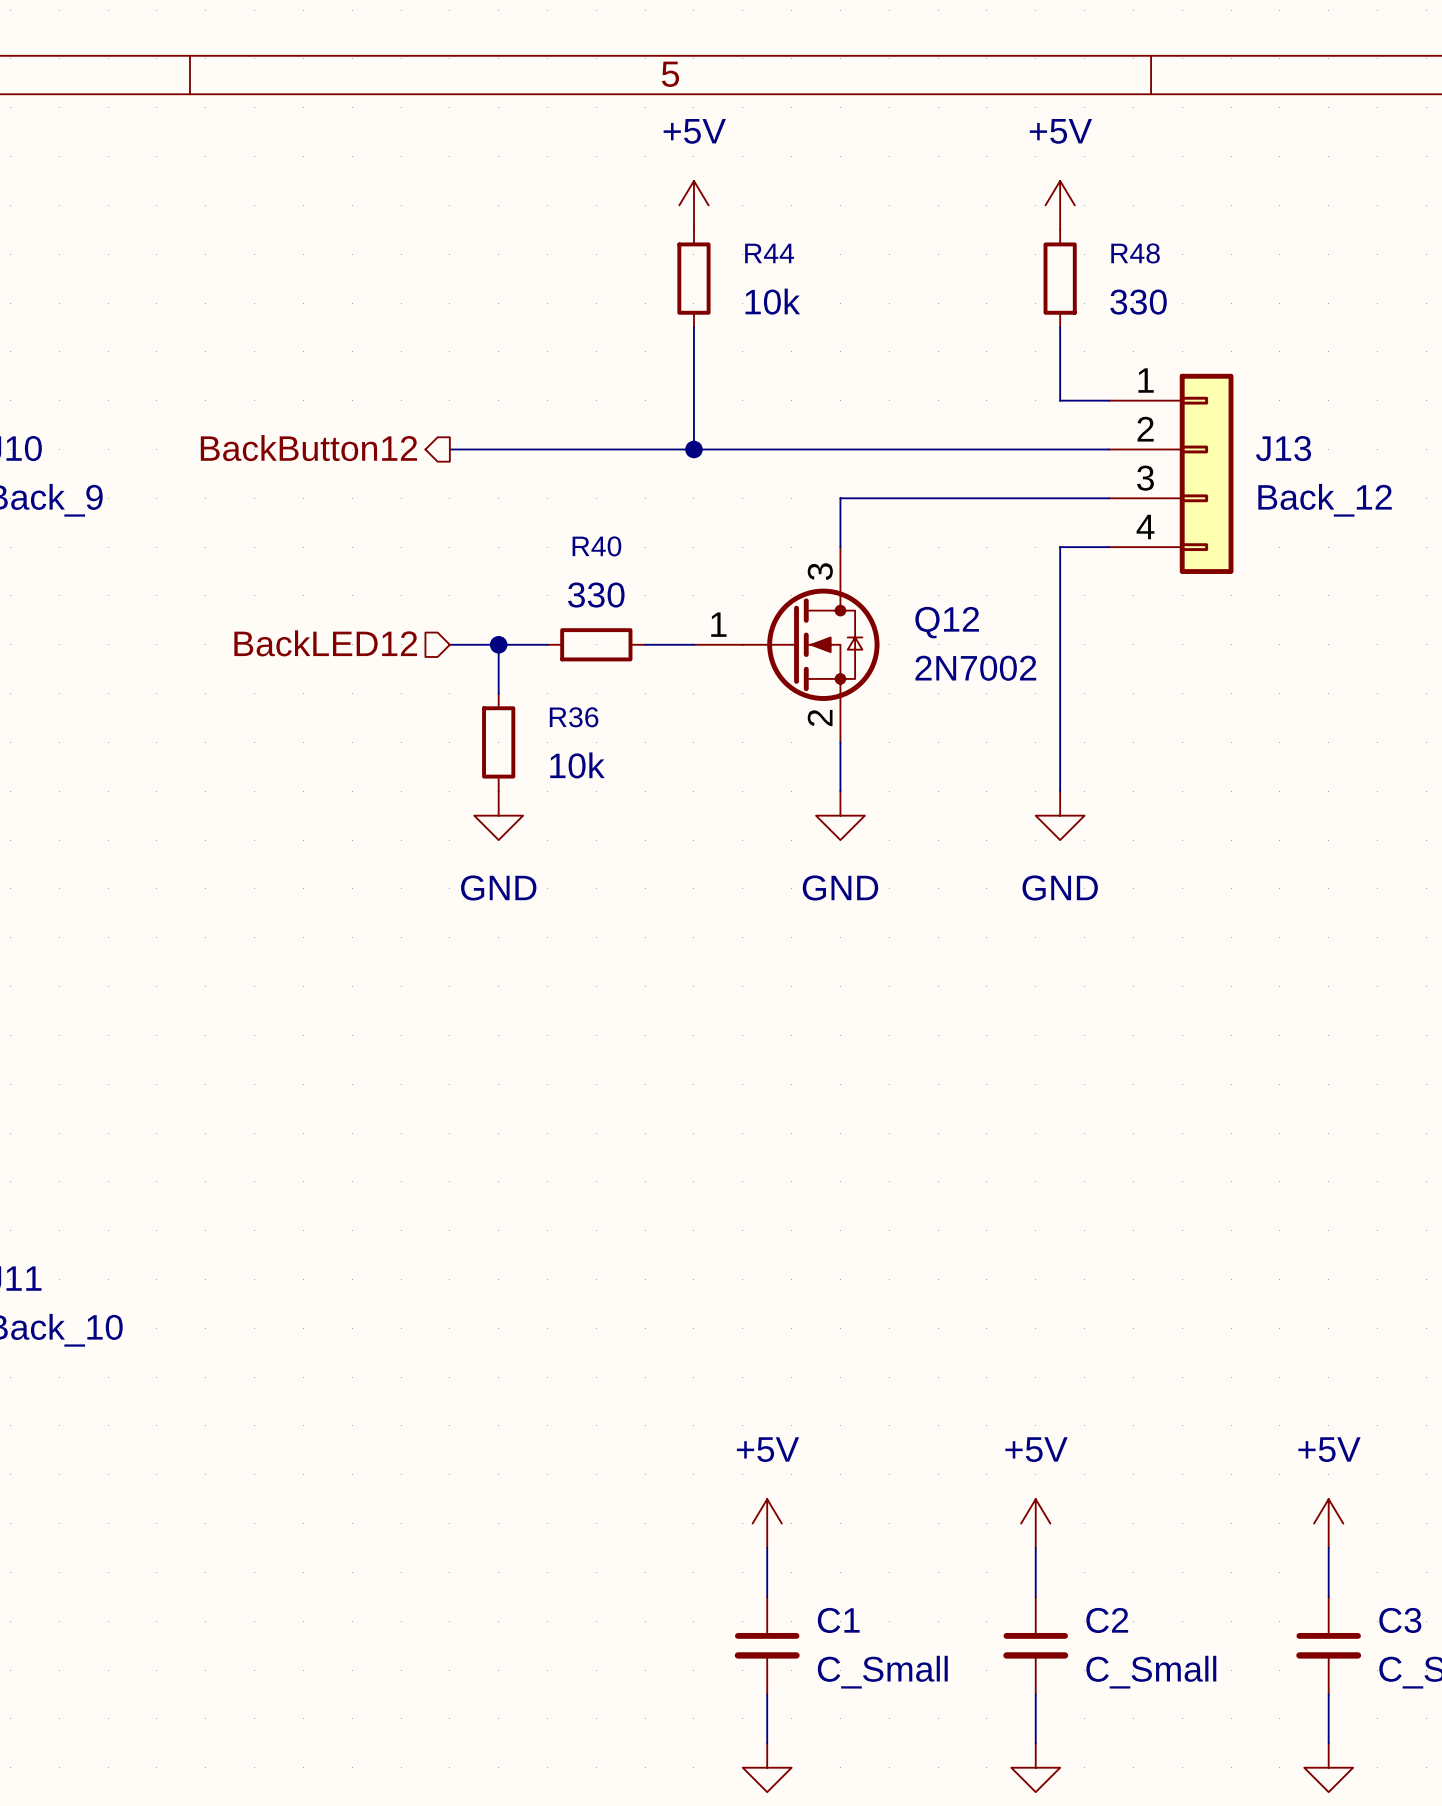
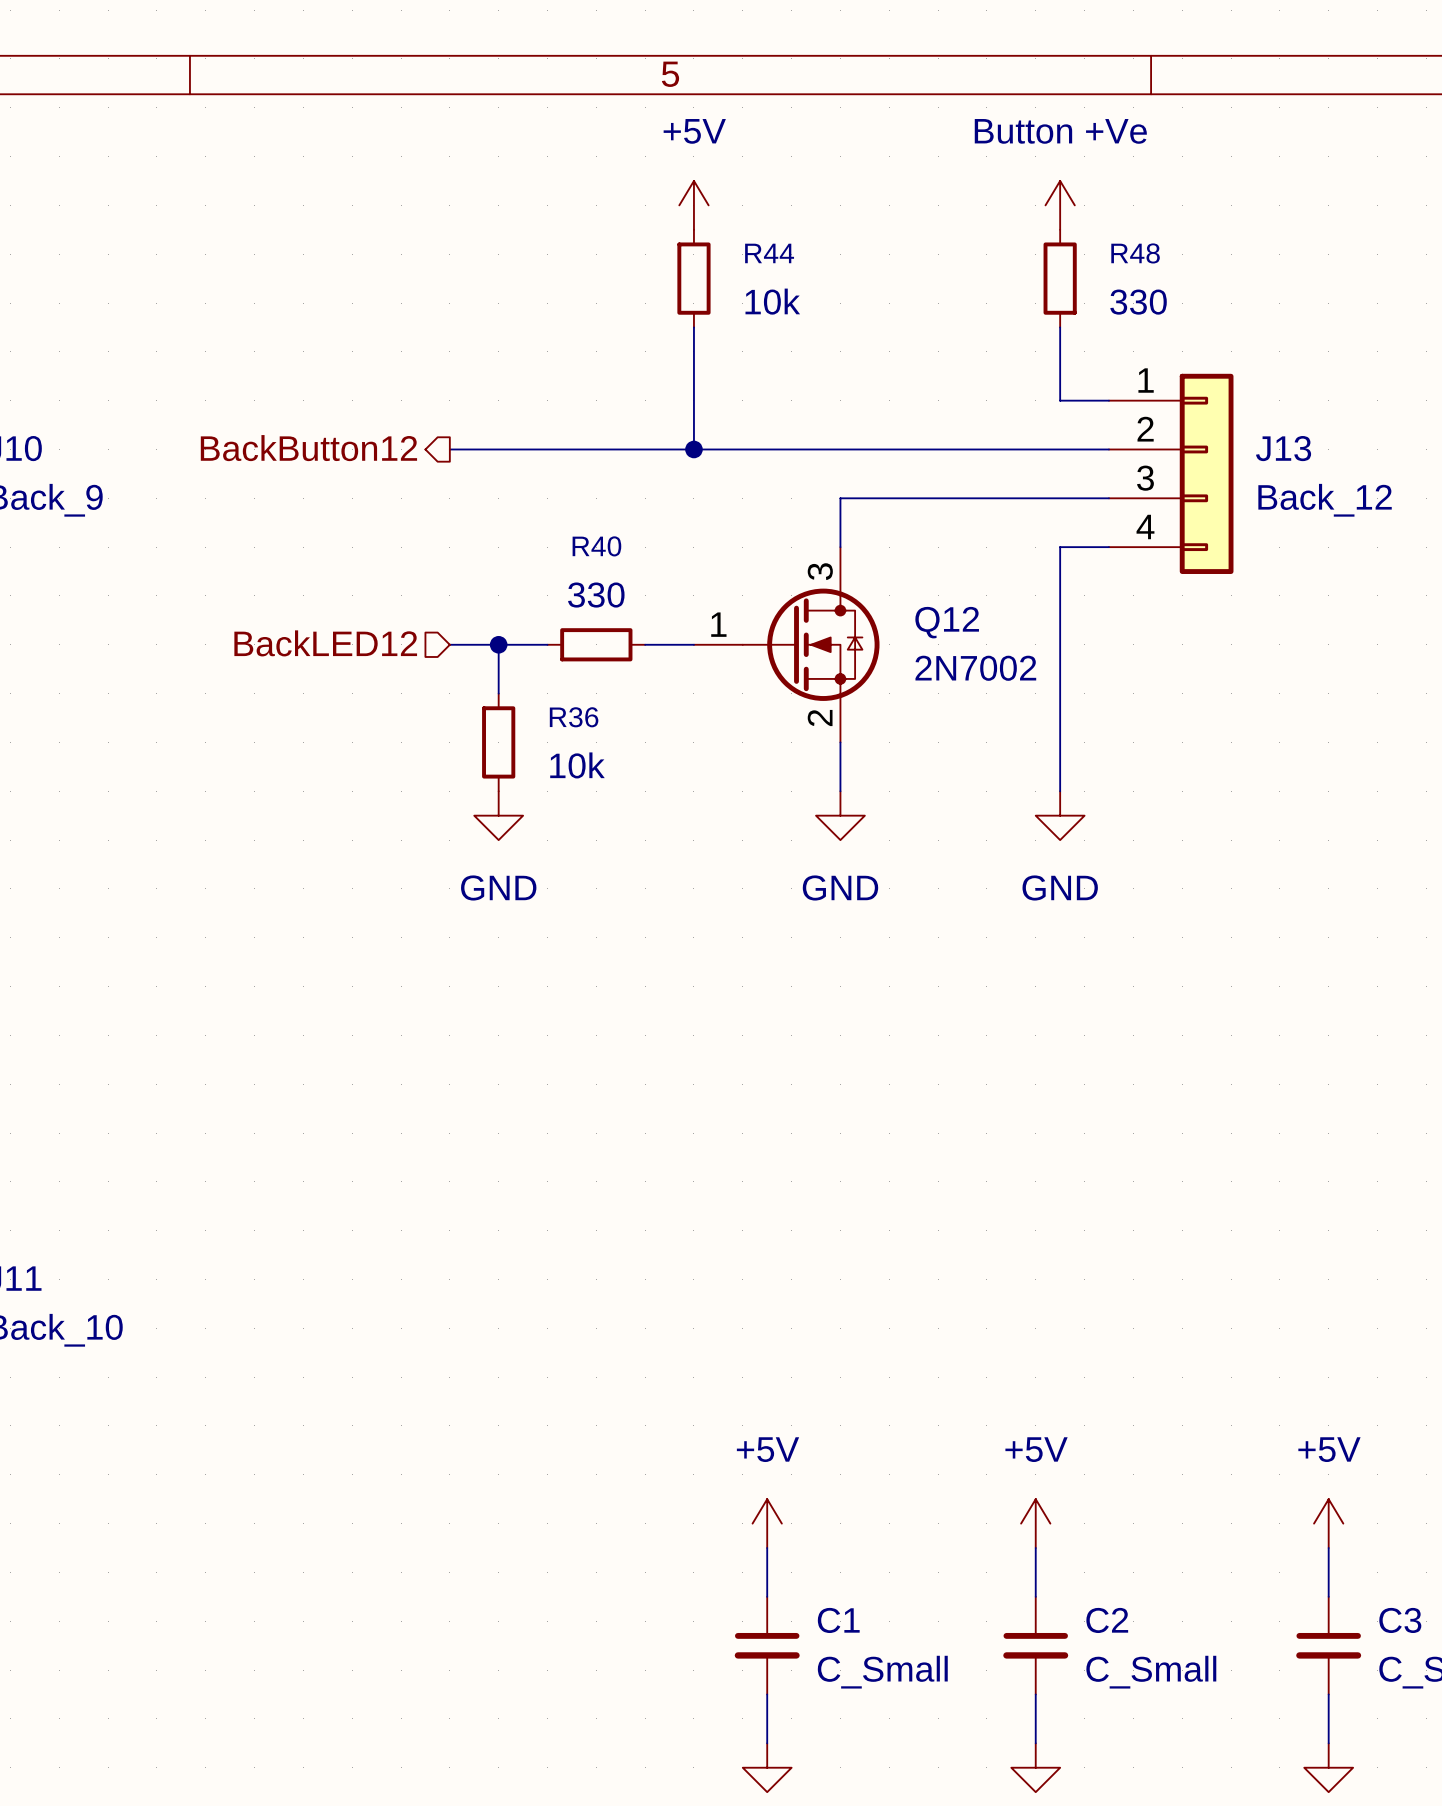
power symbol: +5V (1060, 205) -> Button +Ve (1060, 205)

